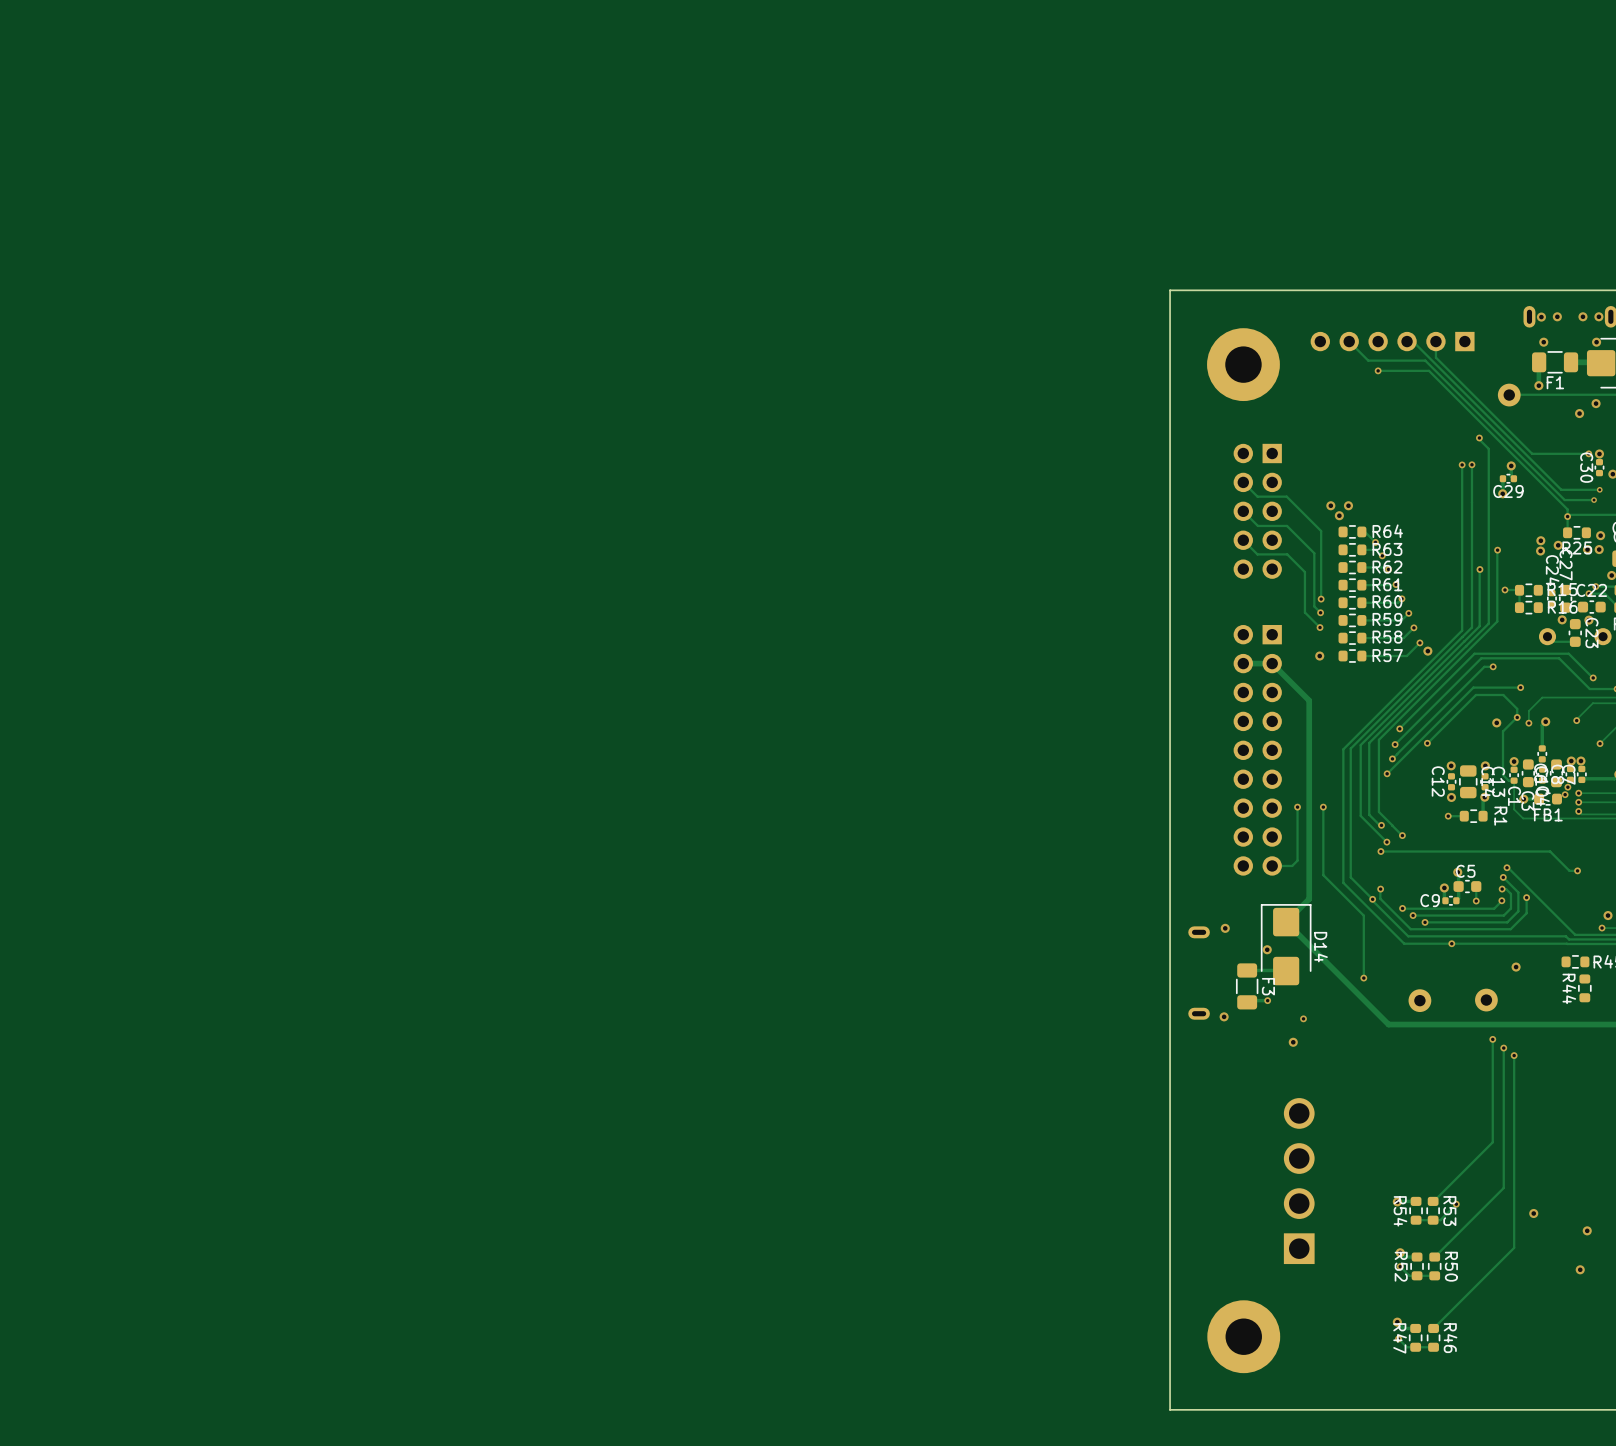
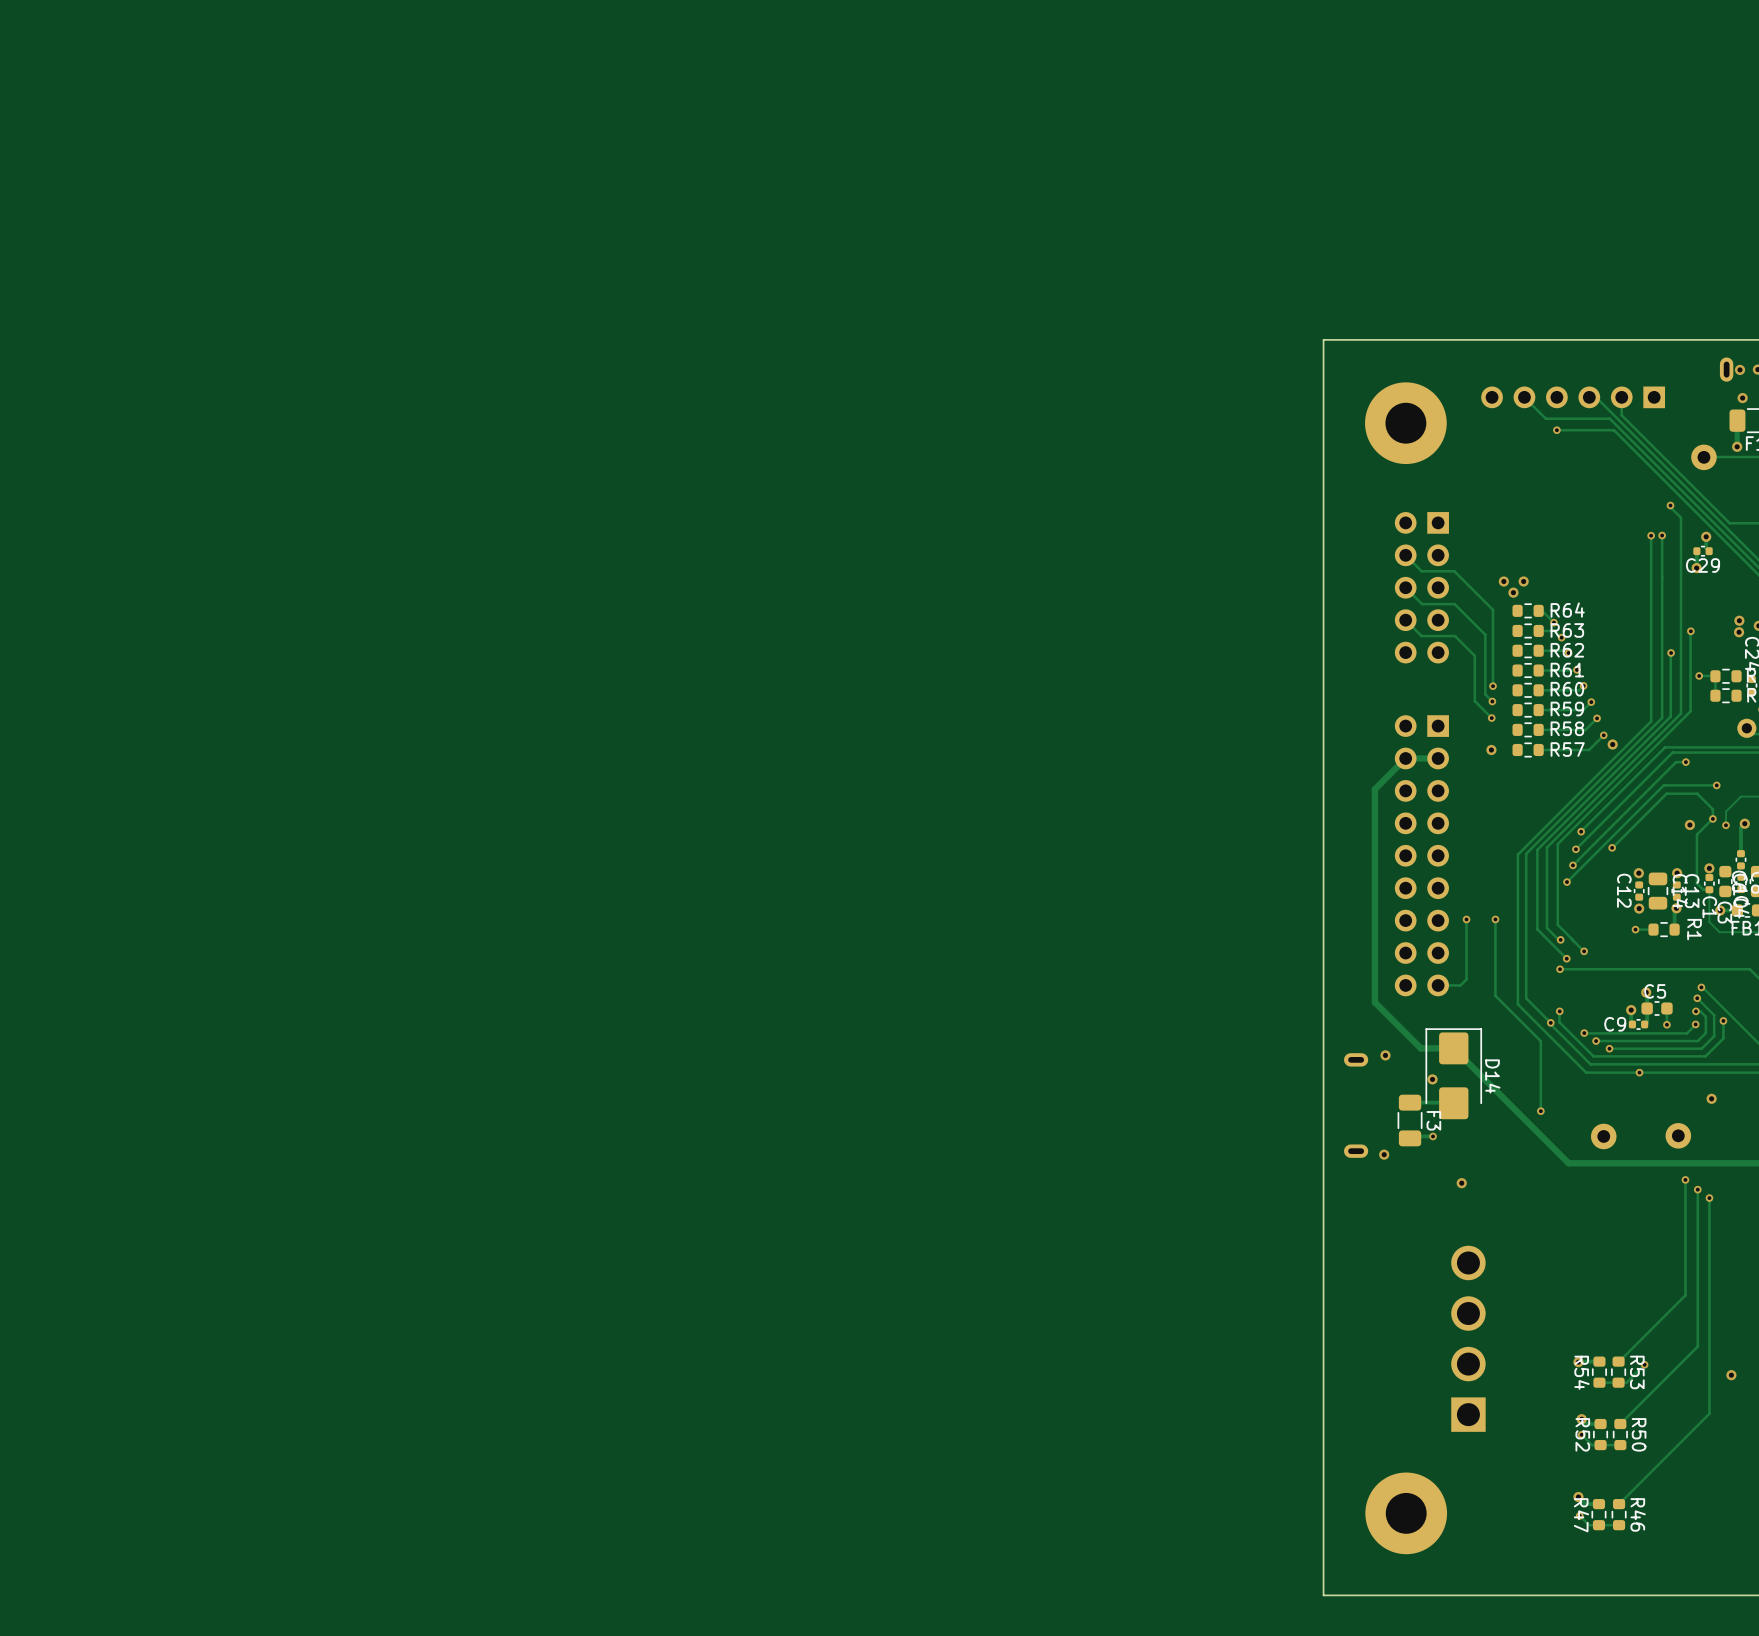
track: (1272, 663) (1309, 700) (1309, 899) (1286, 922) -> (1405, 758) (1374, 789) (1374, 1002) (1420, 1048) (1453, 1048)
via: (1303, 1018) -> none

